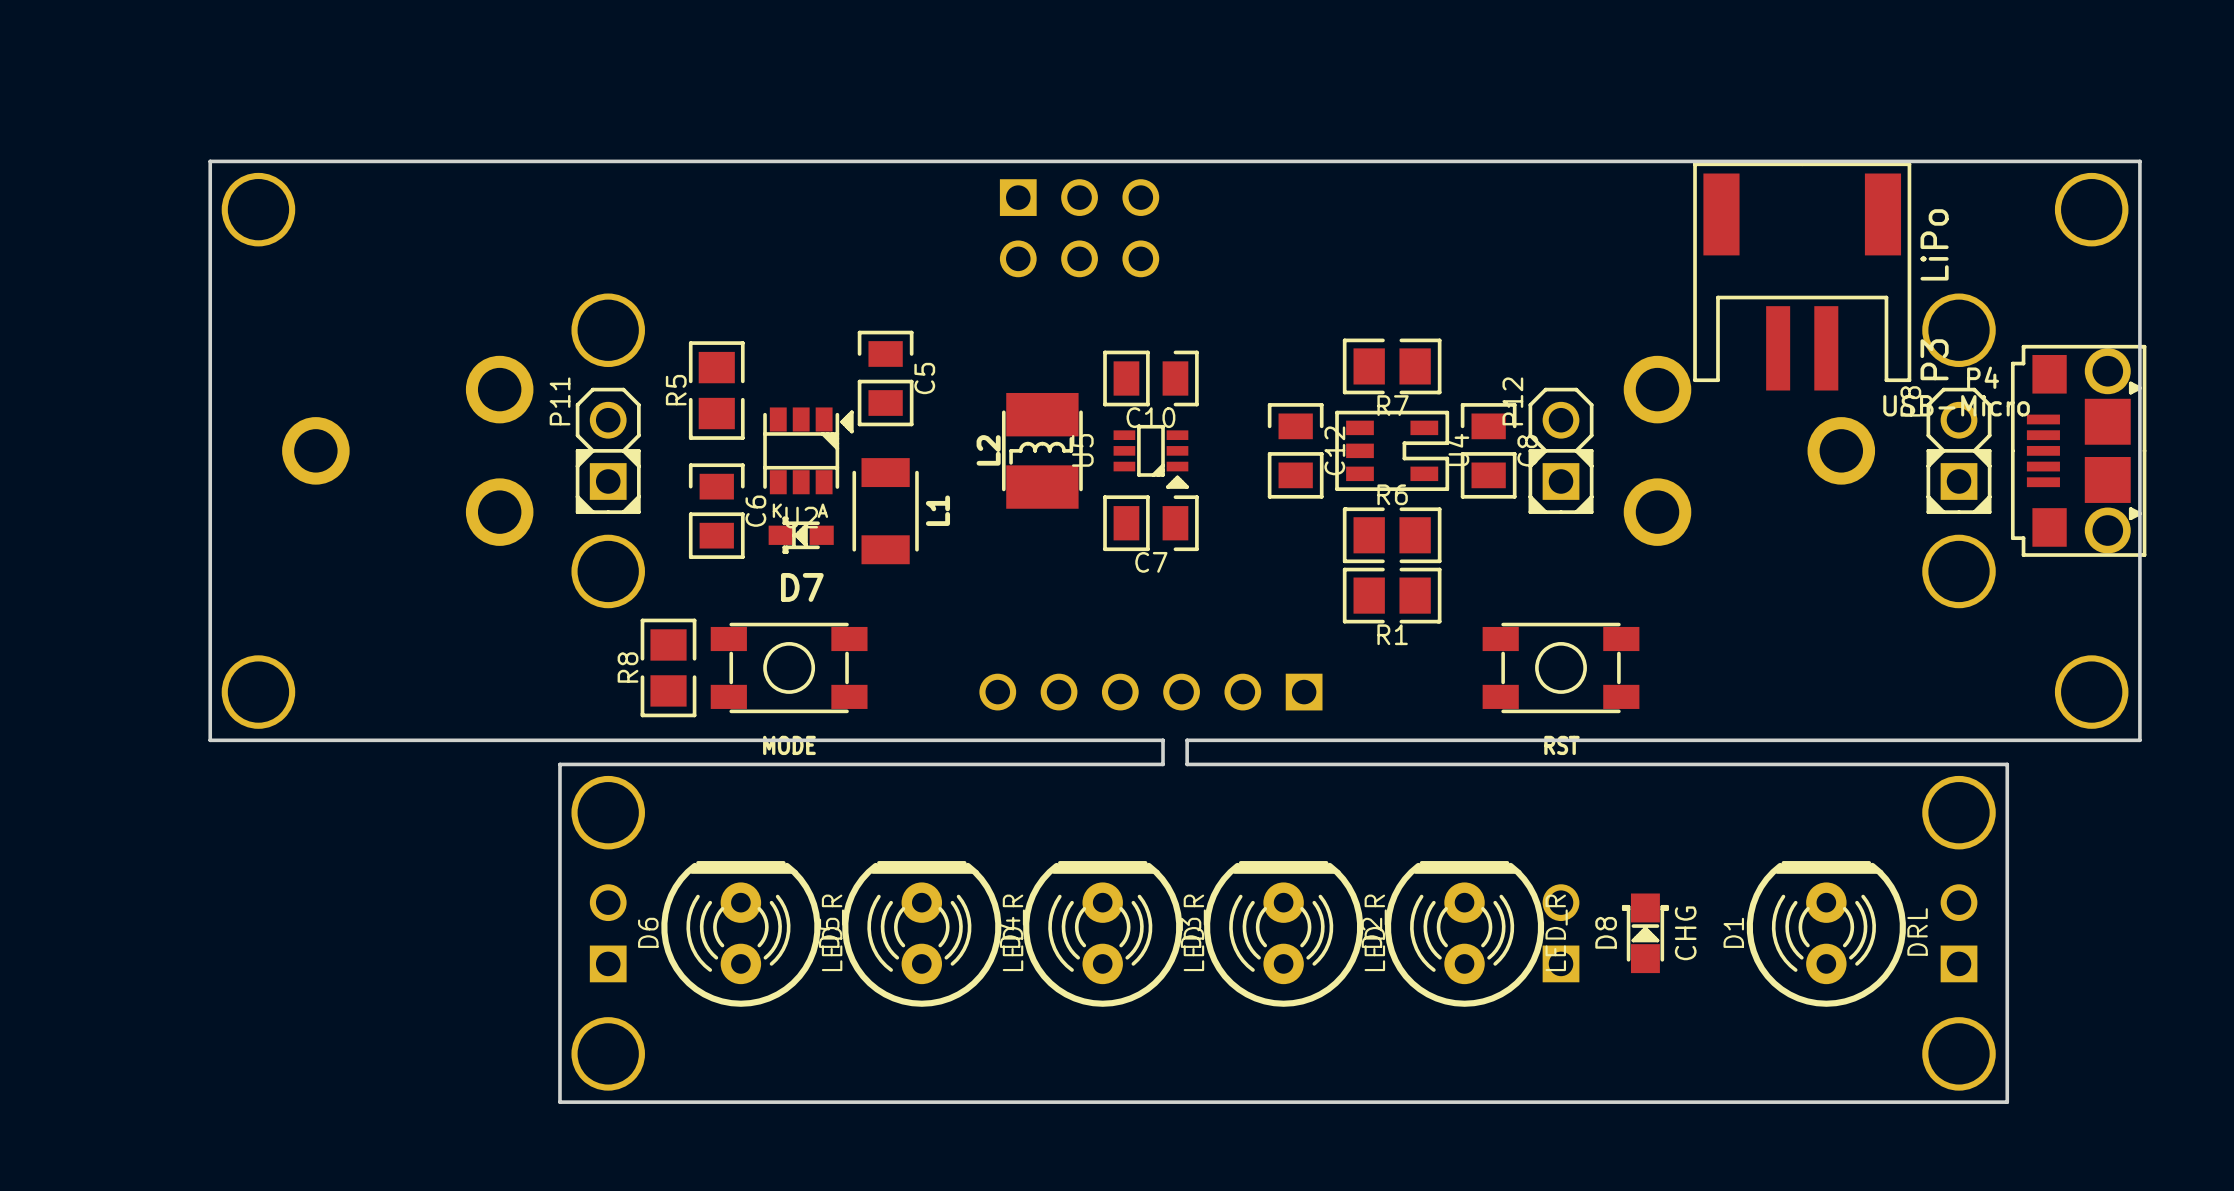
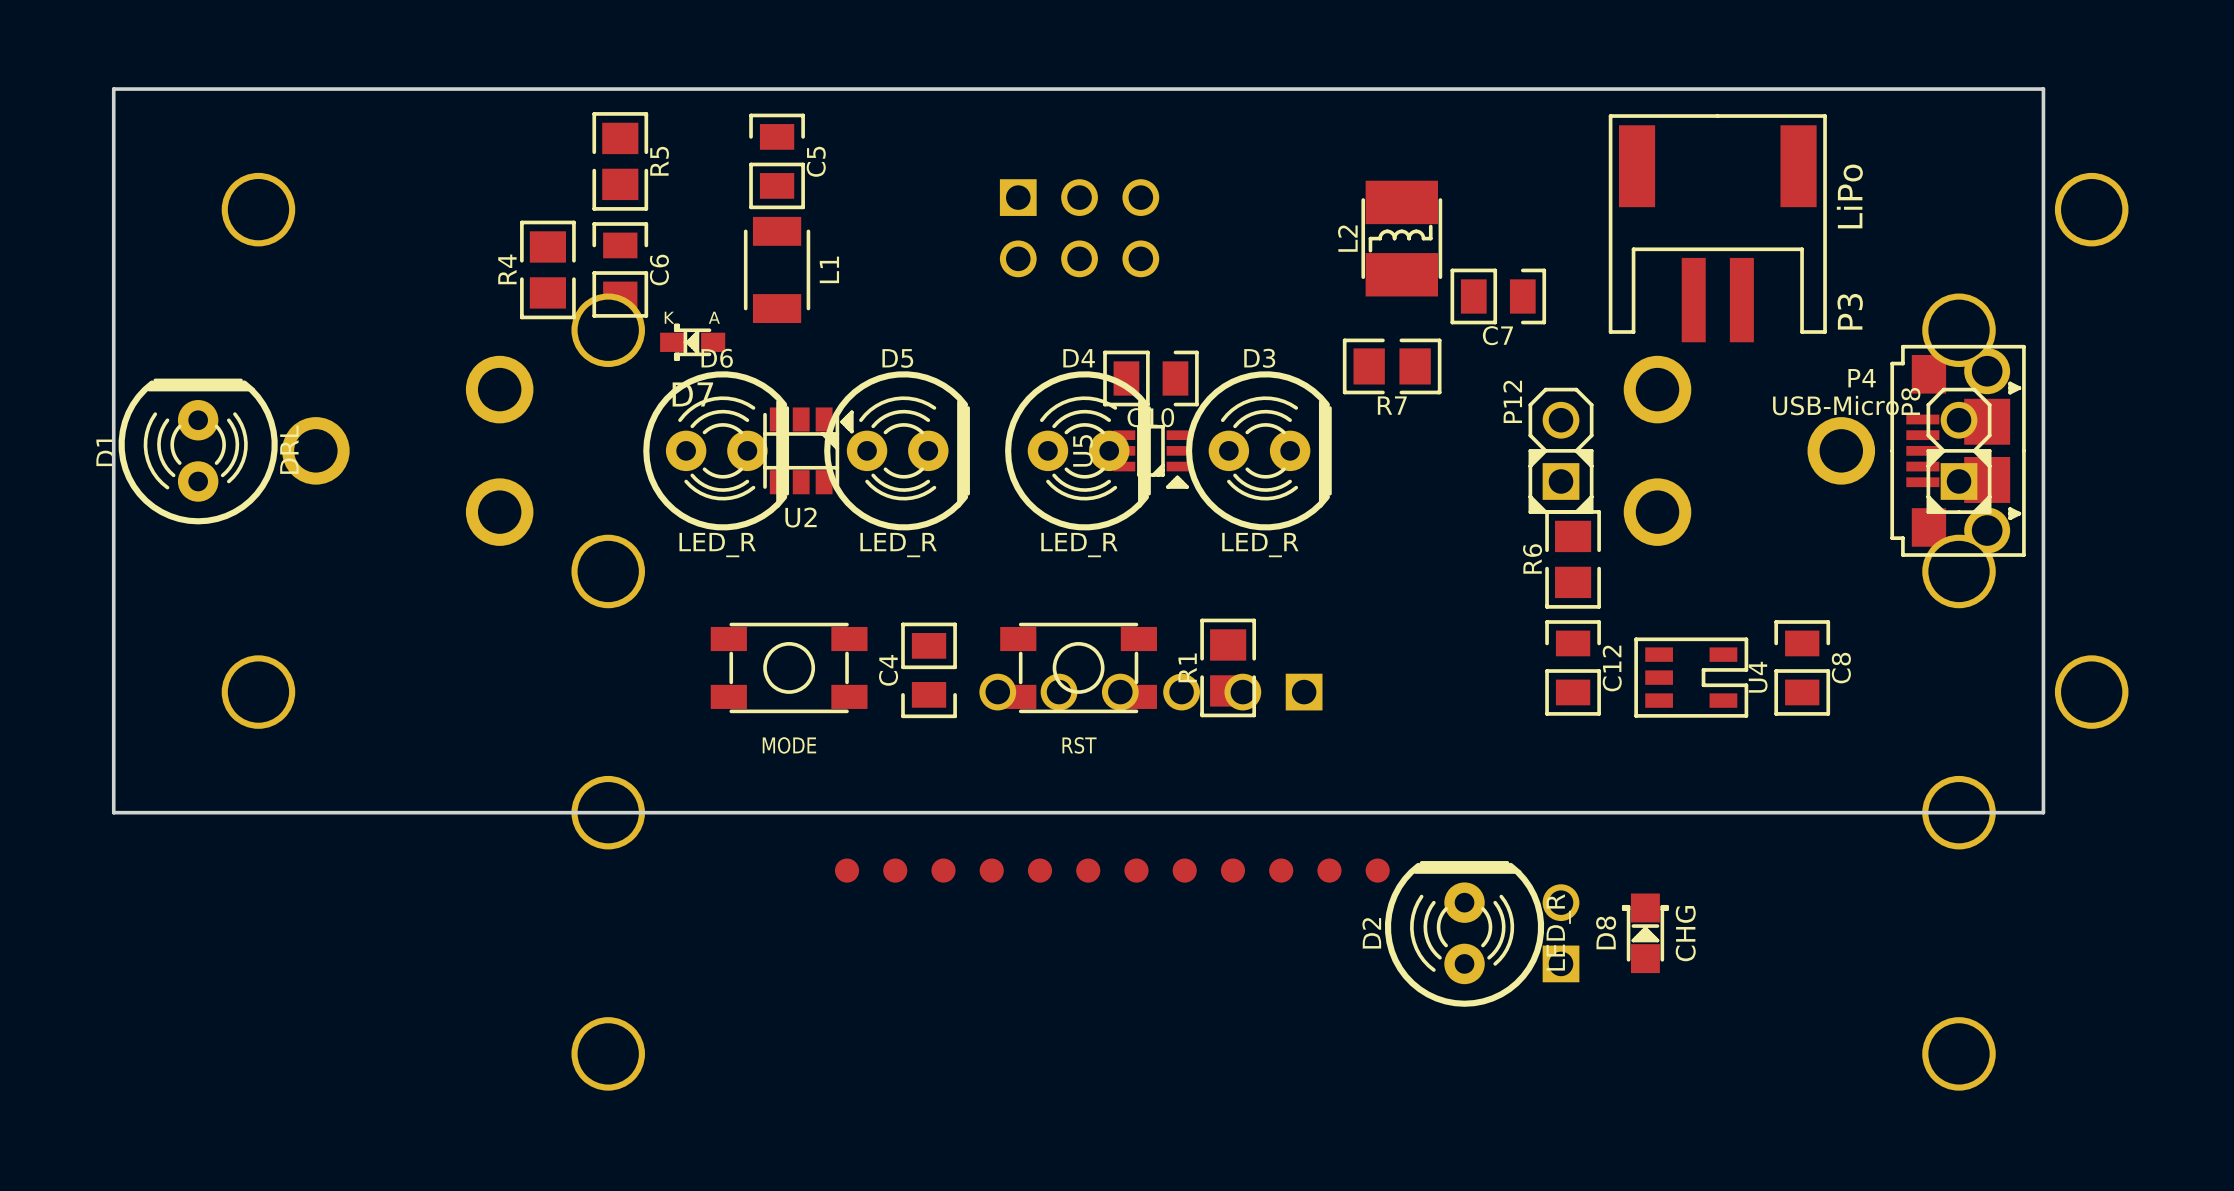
board edge: (210, 161) (210, 740) (1163, 740) (1163, 764) (559, 764) (559, 1102) (2007, 1102) (2007, 764) (1187, 764) (1187, 740) (2139, 740) (2139, 161) (210, 161) -> (113, 89) (113, 812) (2043, 812) (2043, 89) (113, 89)
R4: none -> (547, 269)
P3 position: (1802, 276) -> (1717, 228)
C5 position: (885, 378) -> (777, 161)
R5 rotation: 0° (716, 390) -> 180° (620, 161)
R5 position: (716, 390) -> (620, 161)
P11: (608, 450) -> none
L2 position: (1042, 450) -> (1401, 238)
C12 position: (1295, 450) -> (1573, 667)
U4 position: (1392, 450) -> (1691, 677)
C8 position: (1488, 450) -> (1802, 667)
P4 position: (2078, 450) -> (1958, 450)
C6 position: (716, 511) -> (620, 269)
L1 position: (885, 511) -> (777, 269)
C7 position: (1150, 523) -> (1498, 296)
D7 position: (801, 535) -> (692, 342)
R6 rotation: 0° (1392, 535) -> 90° counterclockwise (1573, 559)
R6 position: (1392, 535) -> (1573, 559)
R1 rotation: 0° (1392, 595) -> 90° clockwise (1228, 667)
R1 position: (1392, 595) -> (1228, 667)
R8: (668, 667) -> none
part position: (1561, 667) -> (1078, 667)
C4: none -> (929, 670)
part: none -> (847, 870)
part: none -> (895, 870)
part: none -> (943, 870)
part: none -> (991, 870)
part: none -> (1039, 870)
part: none -> (1088, 870)
part: none -> (1136, 870)
part: none -> (1184, 870)
part: none -> (1232, 870)
part: none -> (1281, 870)
part: none -> (1329, 870)
part: none -> (1377, 870)
part: (608, 933) -> none
D6 rotation: 0° (740, 933) -> 90° clockwise (716, 450)
D6 position: (740, 933) -> (716, 450)
D5 rotation: 0° (921, 933) -> 90° clockwise (897, 450)
D5 position: (921, 933) -> (897, 450)
D4 rotation: 0° (1102, 933) -> 90° clockwise (1077, 450)
D4 position: (1102, 933) -> (1077, 450)
D3 rotation: 0° (1283, 933) -> 90° clockwise (1258, 450)
D3 position: (1283, 933) -> (1258, 450)
D1 position: (1826, 933) -> (198, 451)
part: (1959, 933) -> none

